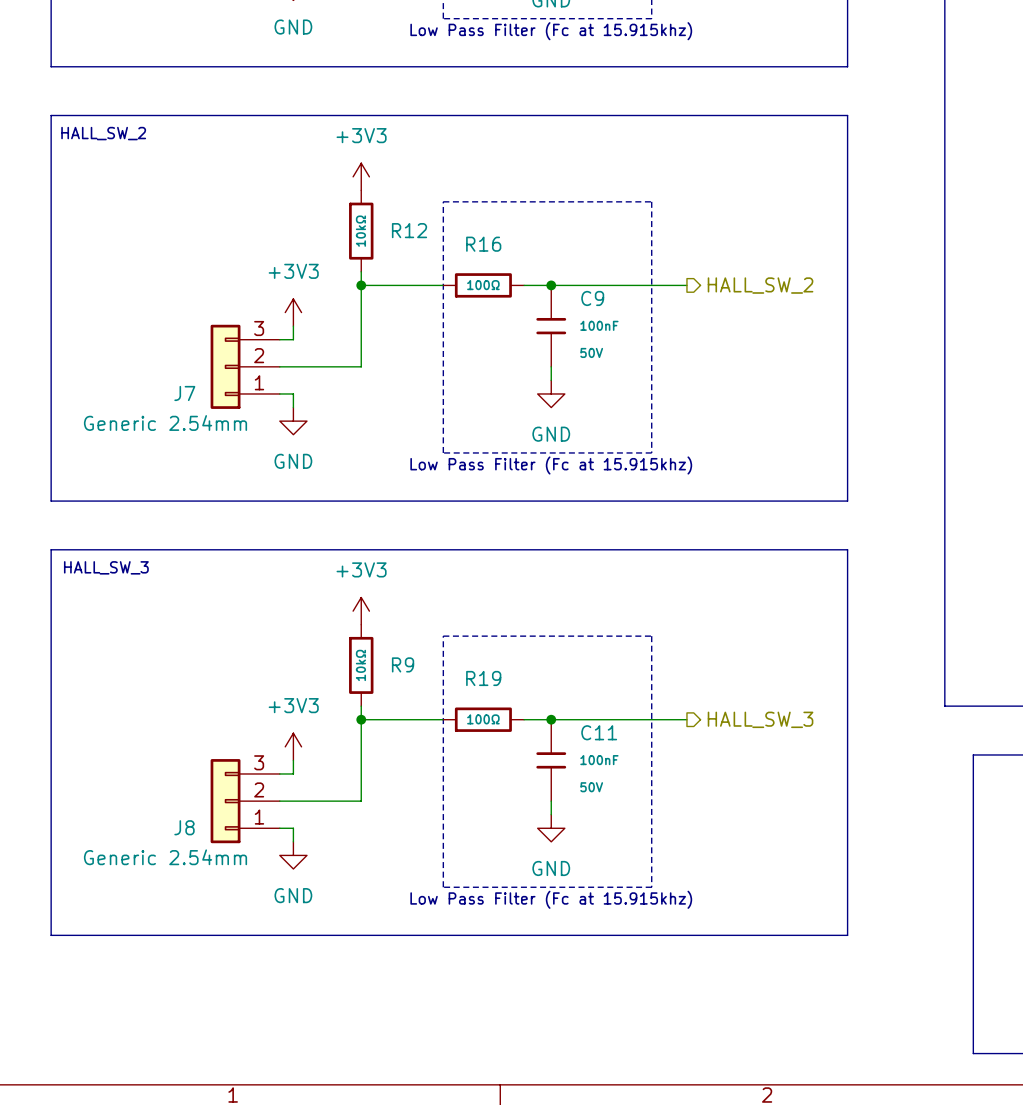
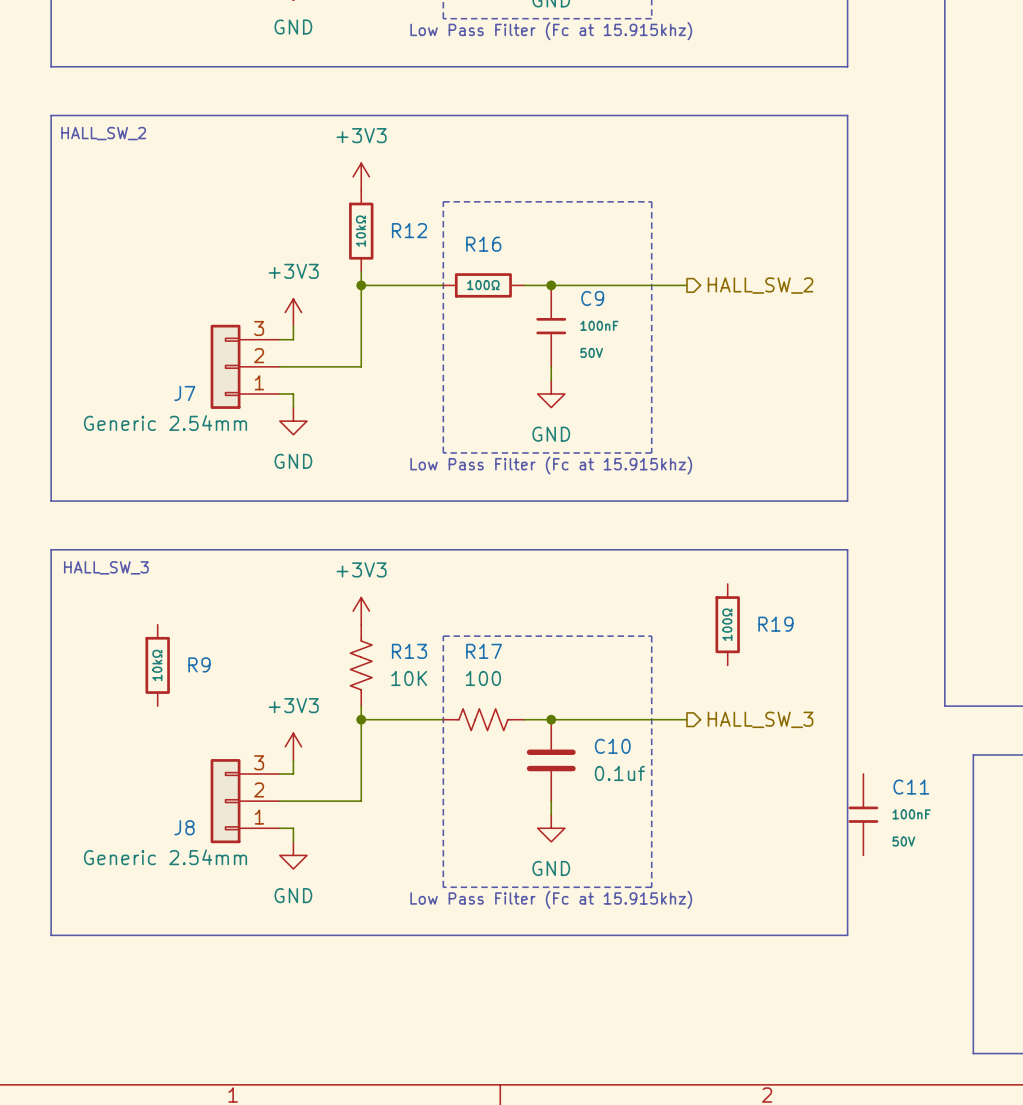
R9 position: (361, 665) -> (157, 665)
R13: none -> 10K (361, 665)
R19 rotation: 0° (483, 719) -> 90° clockwise (727, 624)
R19 position: (483, 719) -> (727, 624)
R17: none -> 100 (483, 719)
C11 position: (551, 760) -> (863, 814)
C10: none -> 0.1uf (551, 760)

